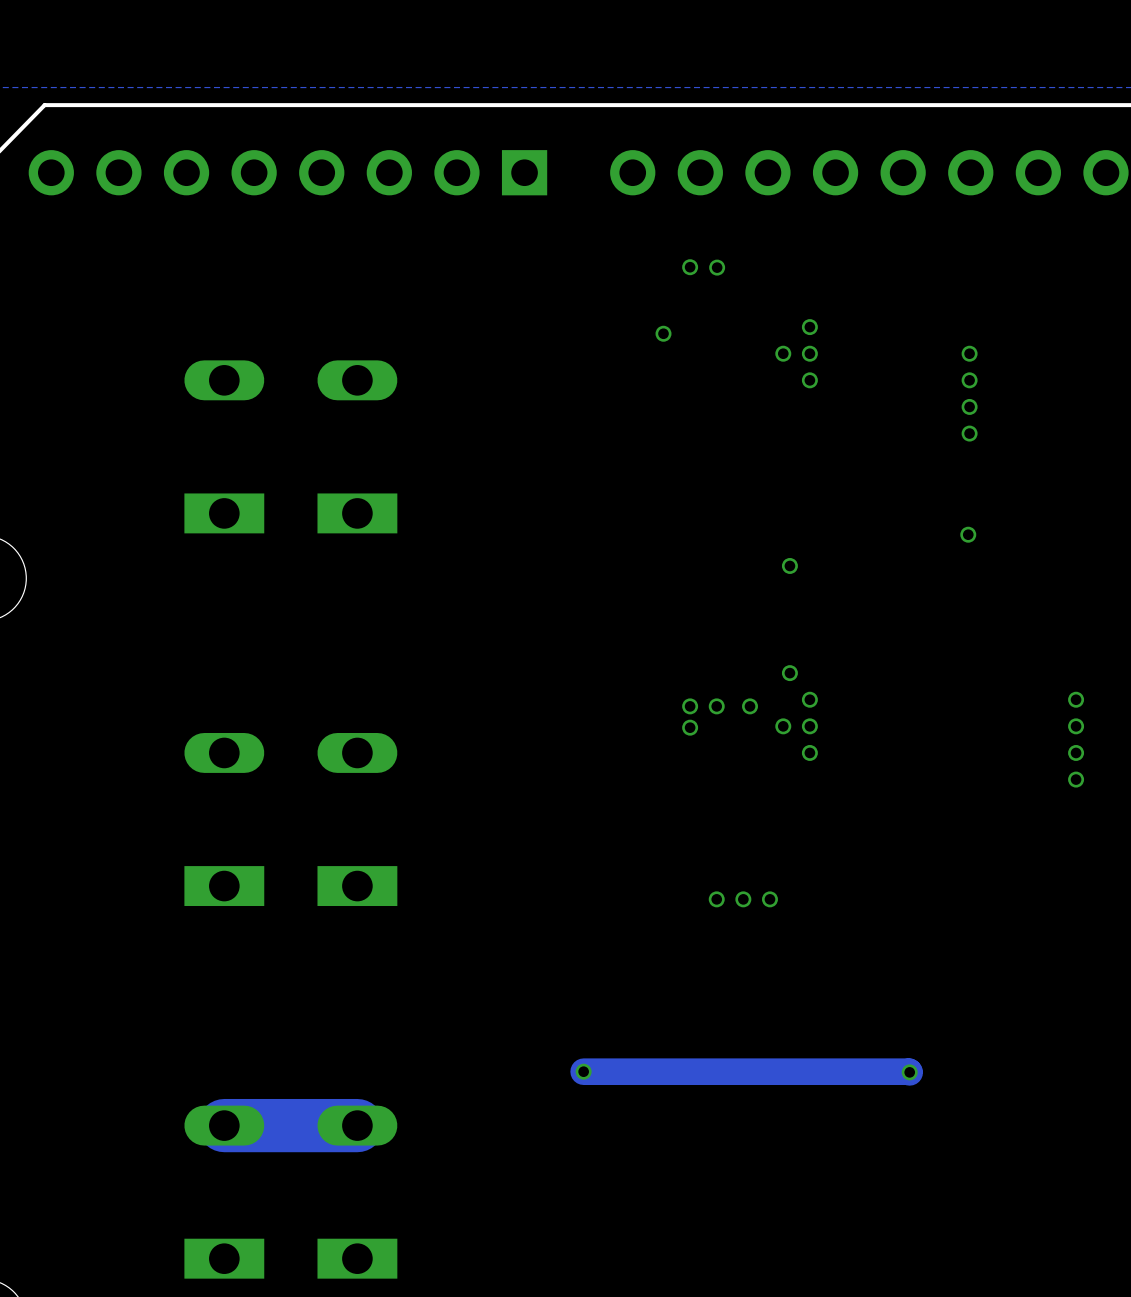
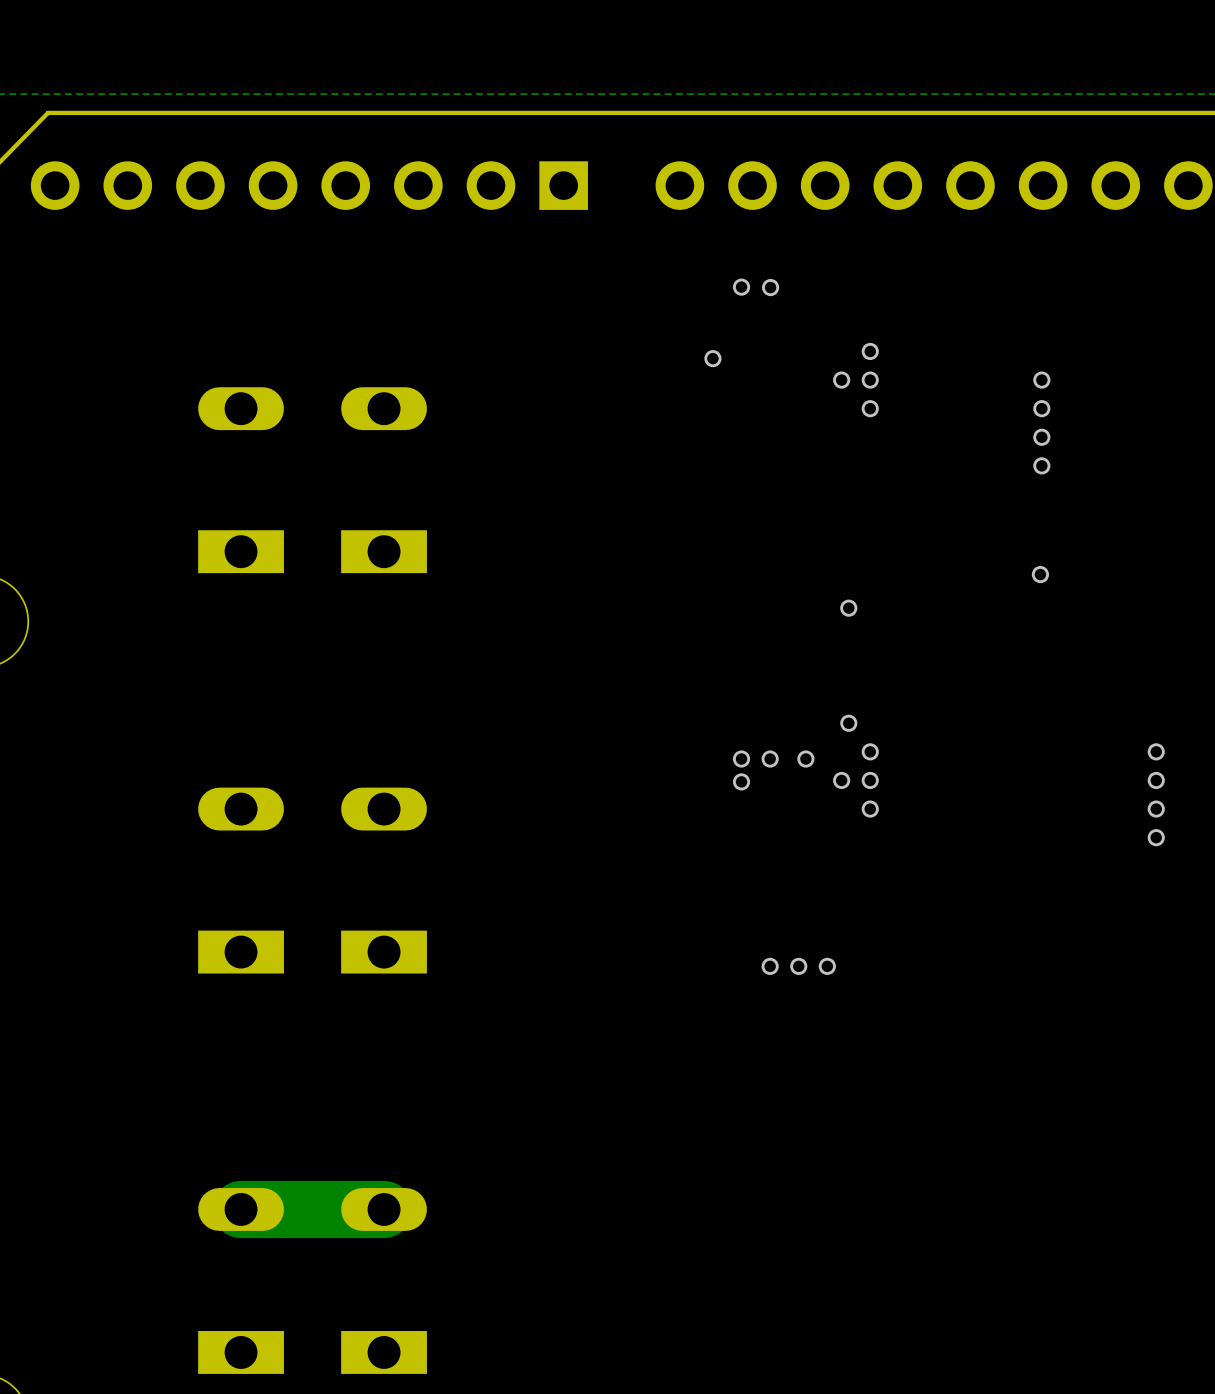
track: (583, 1071) (909, 1072) -> none
via: (583, 1071) -> none
via: (909, 1072) -> none

